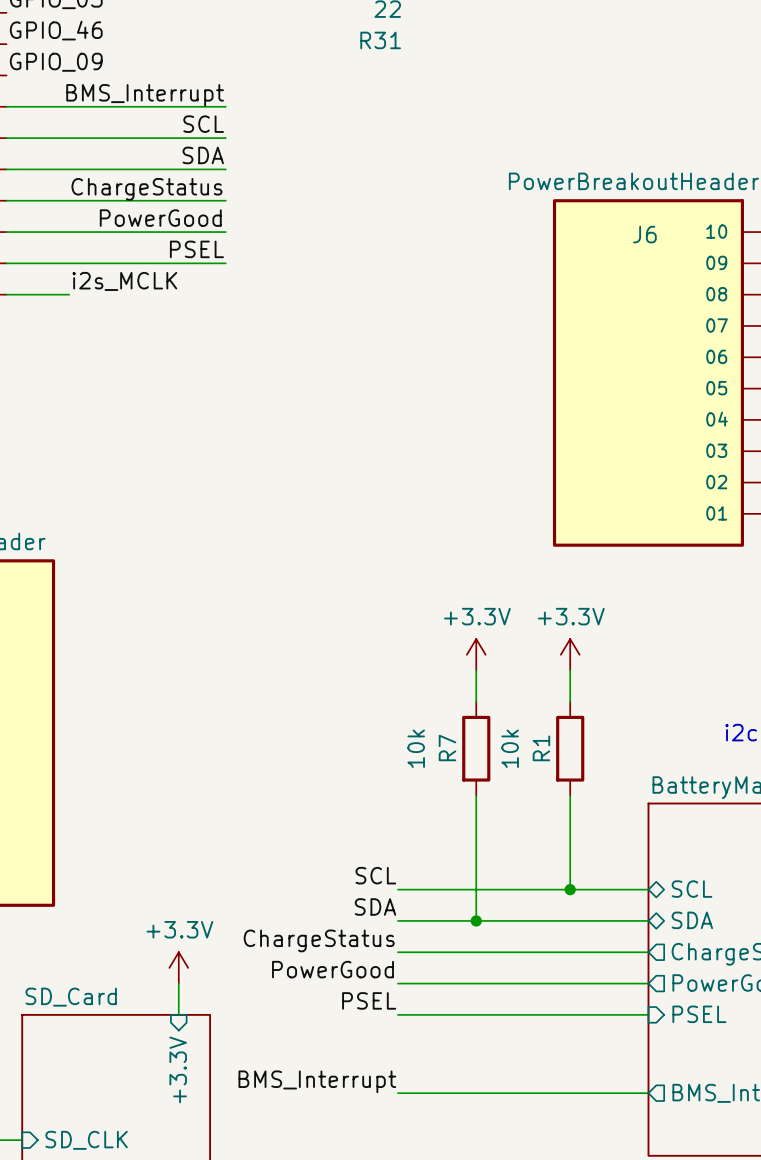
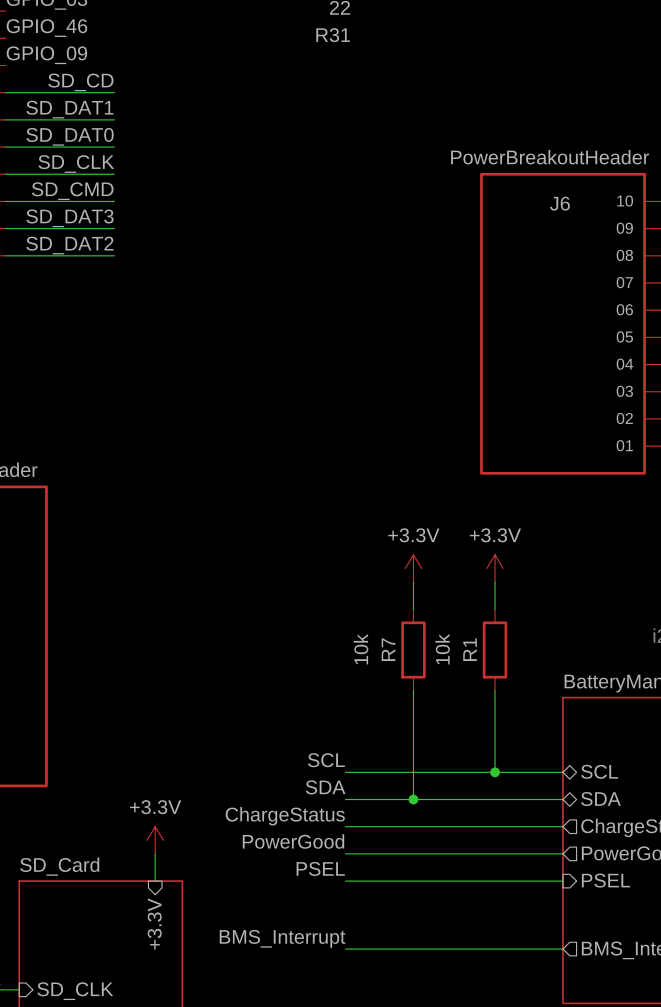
label: none -> SD_CD (80, 82)
label: BMS_Interrupt (145, 95) -> none
wire: (131, 106) (225, 106) -> none
label: none -> SD_DAT1 (69, 109)
label: SCL (203, 124) -> none
wire: (131, 138) (225, 138) -> none
label: SDA (203, 155) -> none
label: none -> SD_DAT0 (70, 136)
wire: (131, 169) (225, 169) -> none
label: none -> SD_CLK (76, 163)
label: ChargeStatus (146, 189) -> none
wire: (131, 200) (225, 200) -> none
label: none -> SD_CMD (72, 191)
label: PowerGood (160, 218) -> none
wire: (131, 232) (225, 232) -> none
label: PSEL (196, 249) -> none
label: none -> SD_DAT3 (69, 218)
wire: (131, 263) (225, 263) -> none
label: none -> SD_DAT2 (69, 245)
label: i2s_MCLK (124, 281) -> none
wire: none -> (60, 255) (114, 255)

